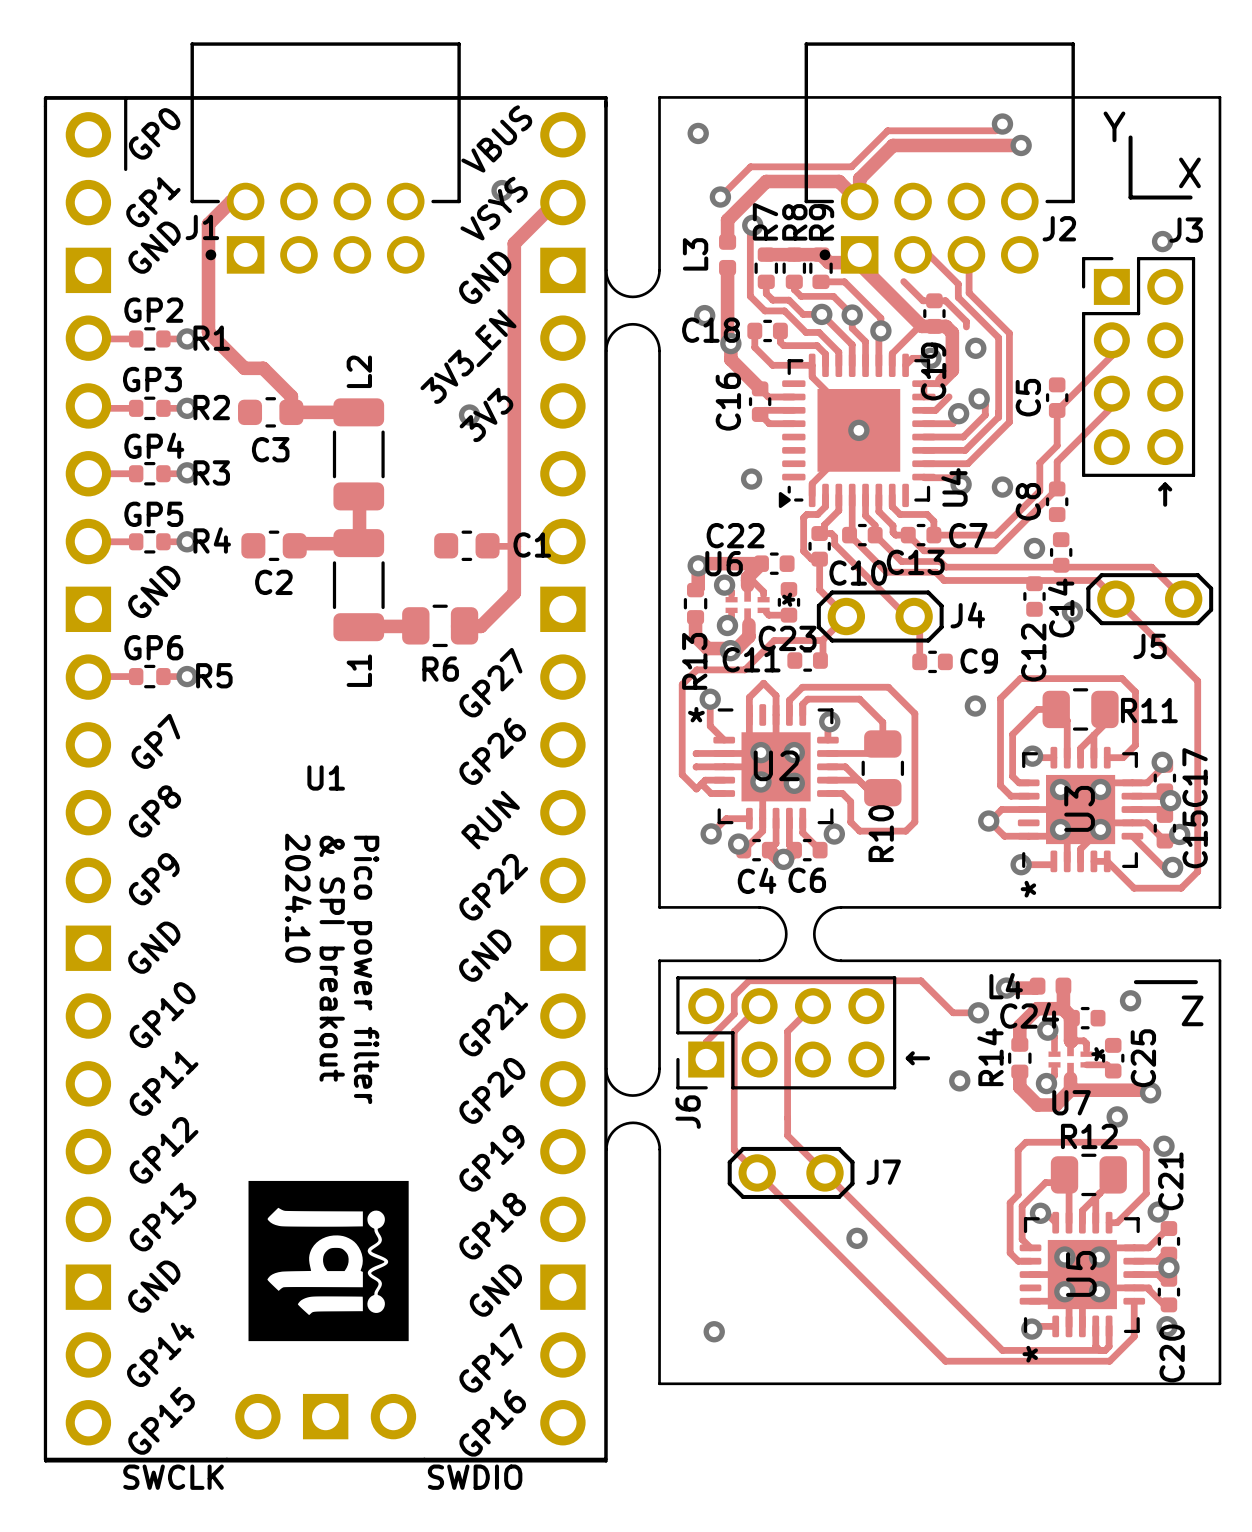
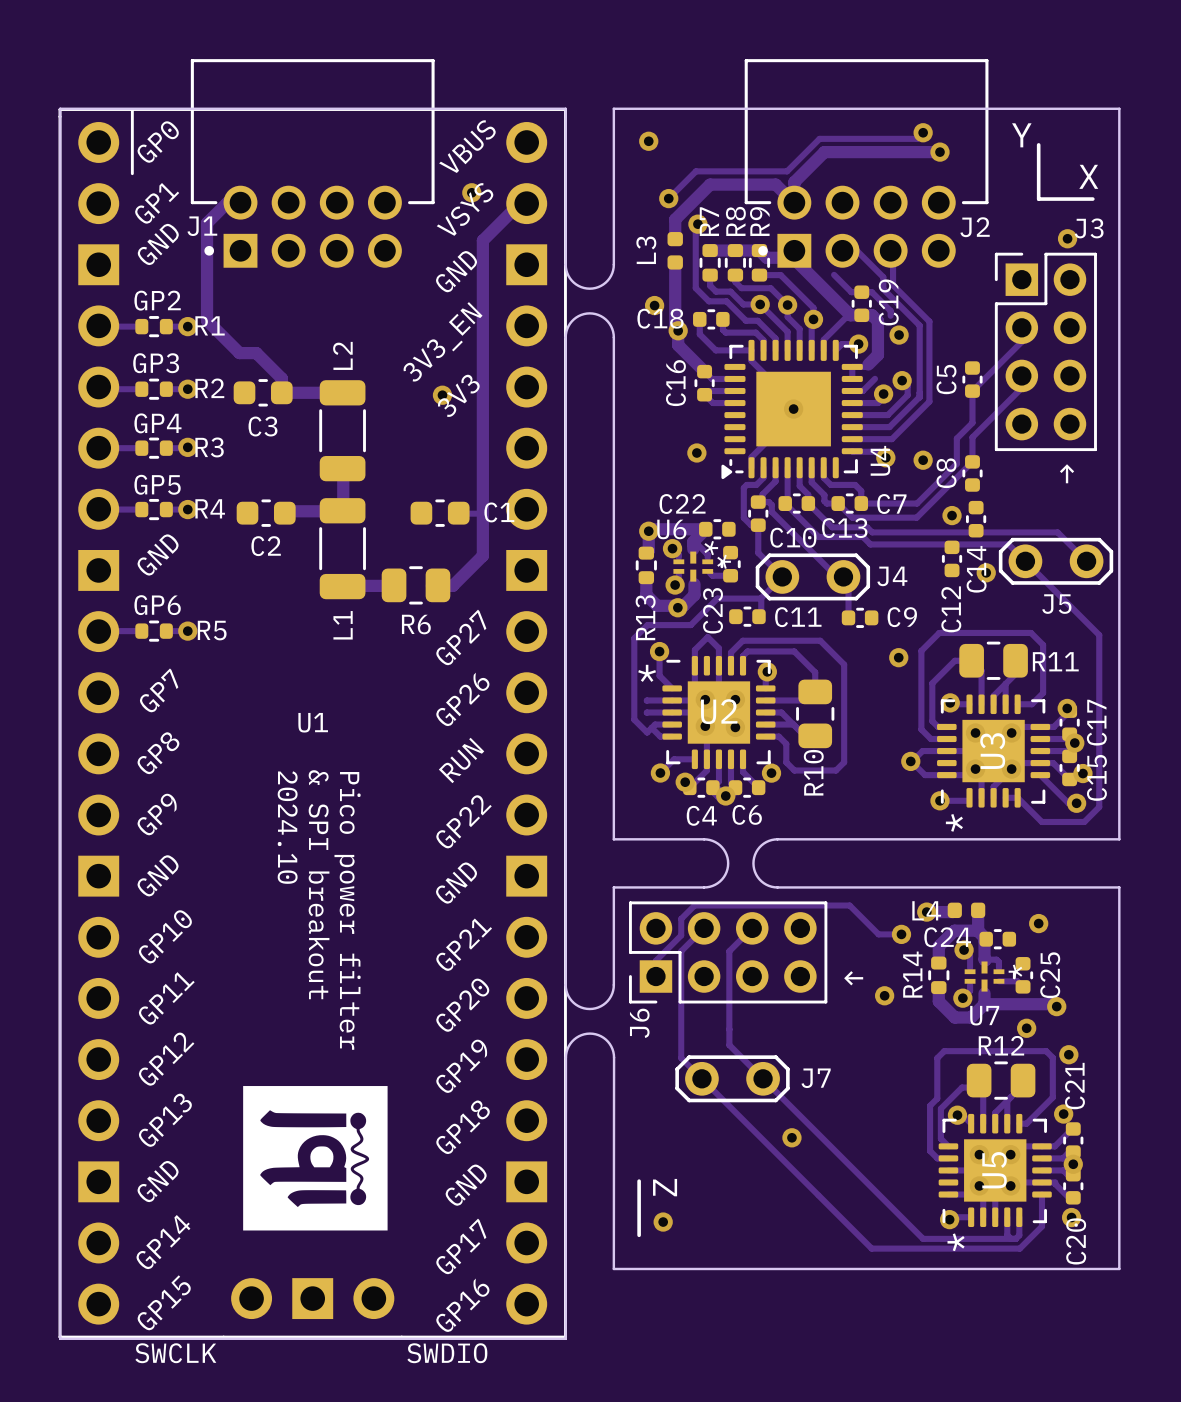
C19 name position: C19 (933, 371) -> C19 (888, 302)
U6 text: none -> * (711, 548)
C23 name rotation: 0° (787, 638) -> 90° counterclockwise (713, 610)
C11 name position: C11 (751, 659) -> C11 (798, 617)
line: (1135, 982) (1195, 982) -> none
text rotation: 0° (1192, 1010) -> 90° counterclockwise (665, 1187)
text position: Z (1192, 1010) -> Z (665, 1187)
line: none -> (639, 1181) (639, 1235)

